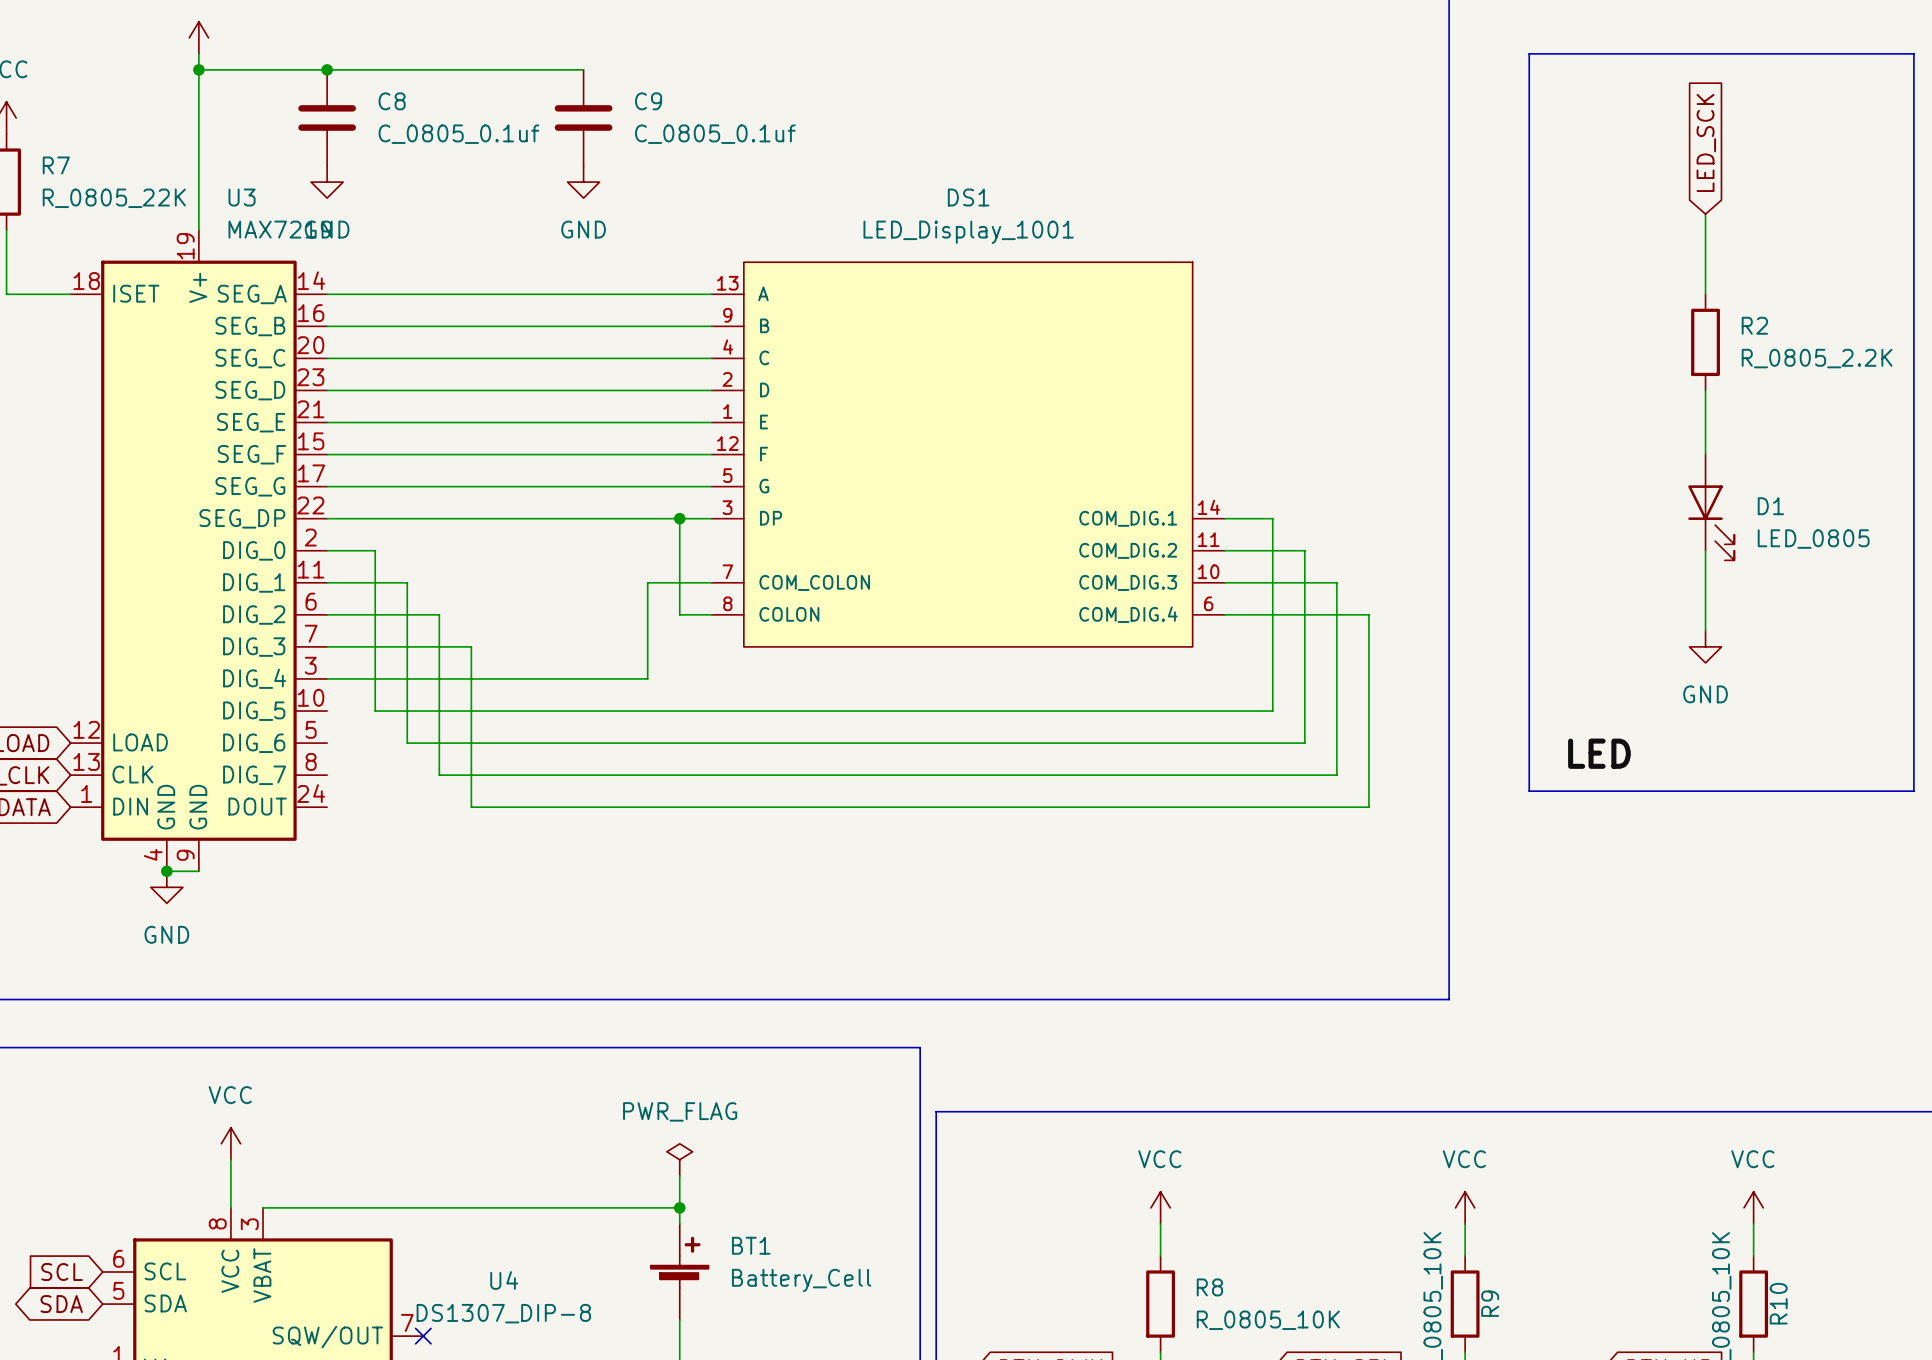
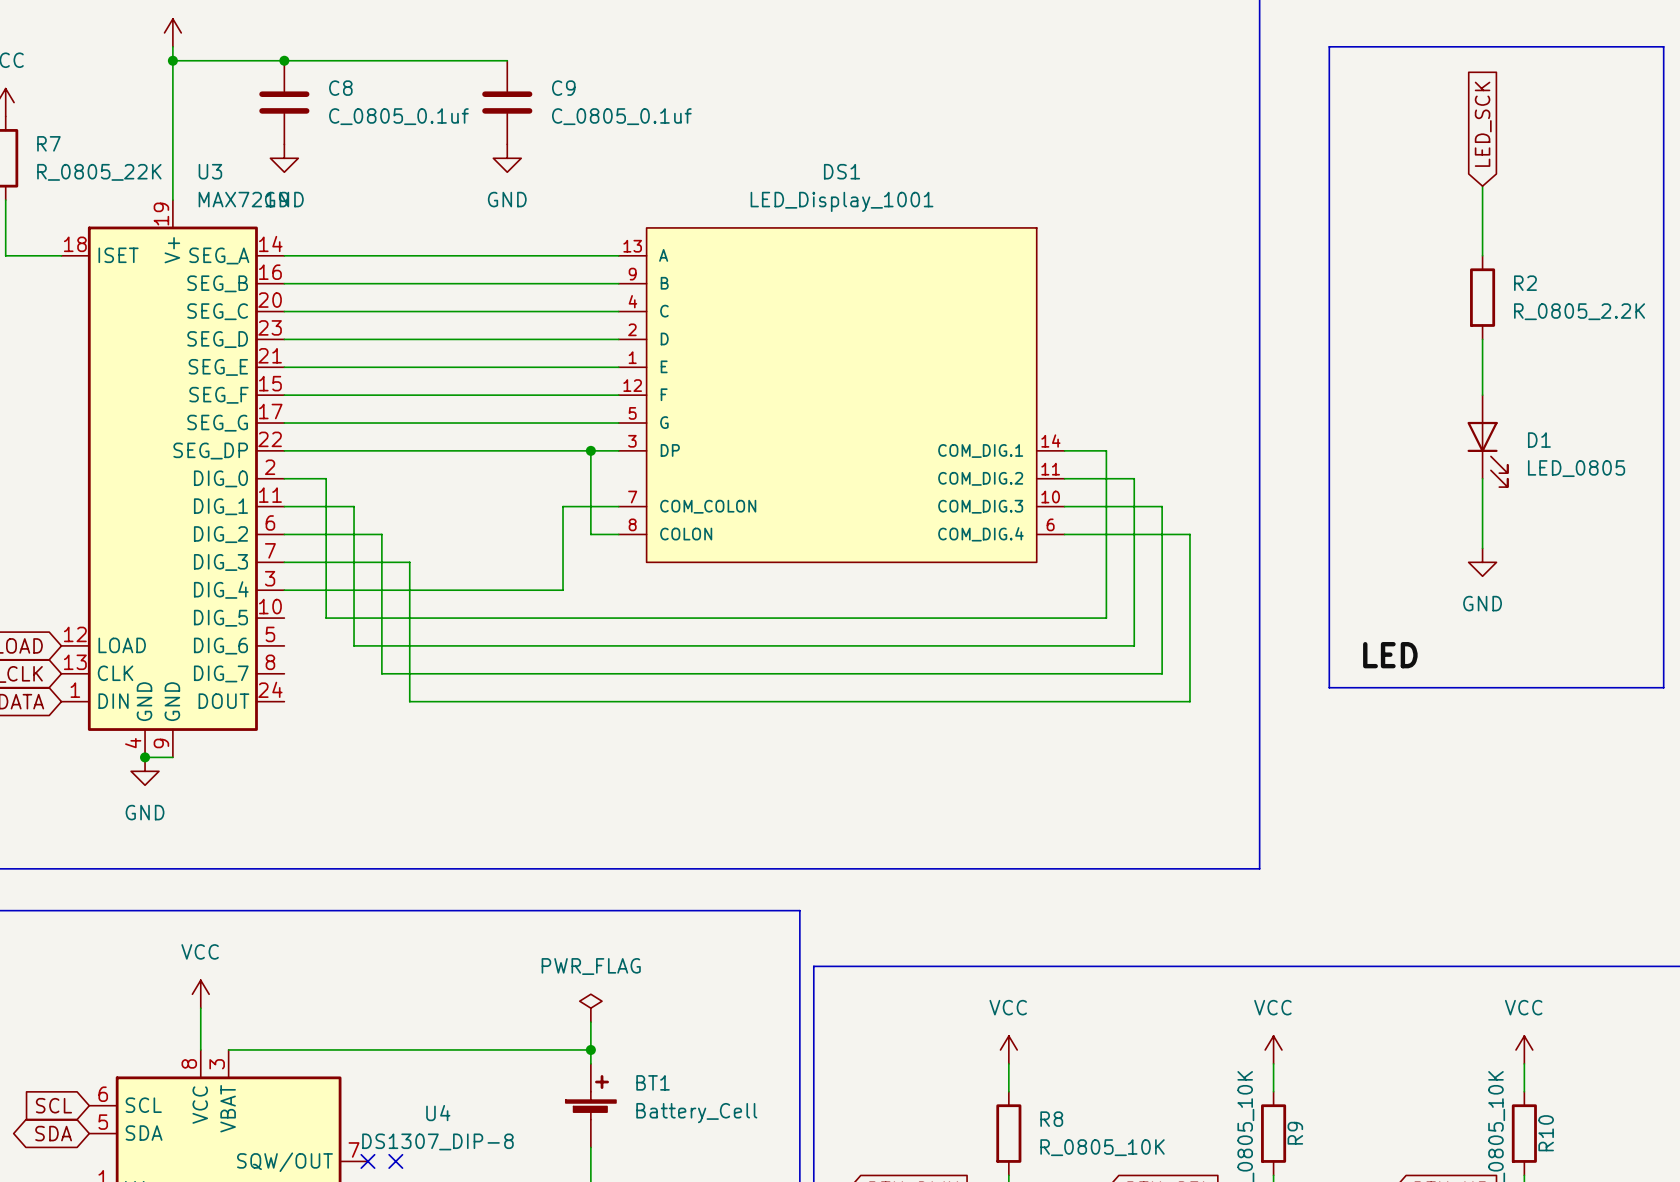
no-connect mark: none -> (395, 1161)

